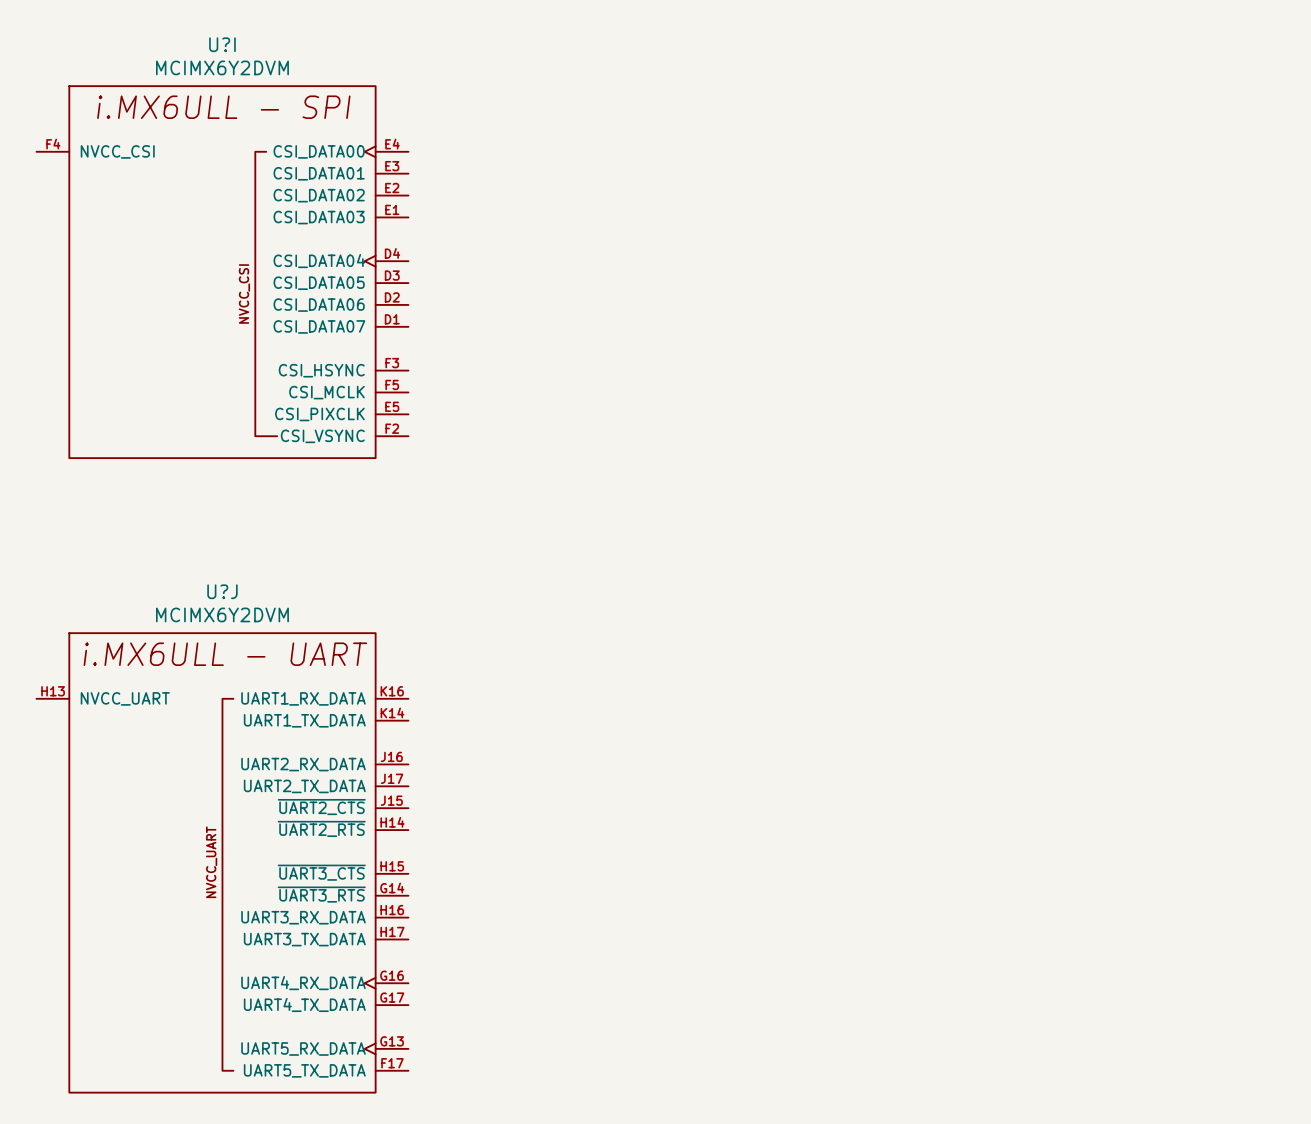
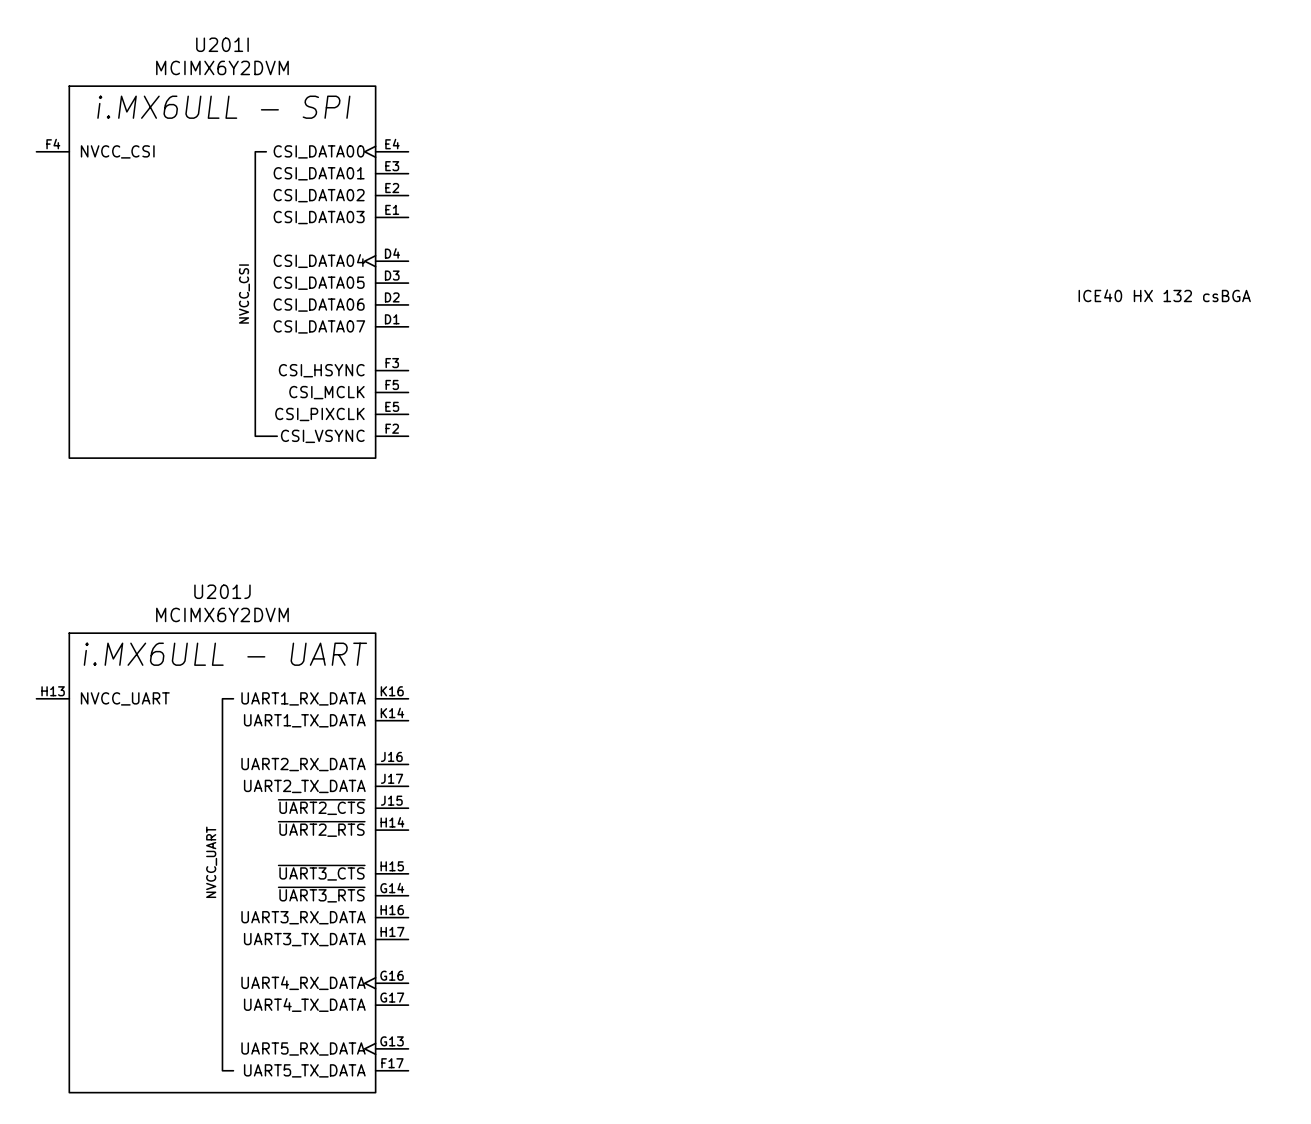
U?I name: U?I (222, 44) -> U201I (222, 44)
text: none -> ICE40 HX 132 csBGA (1164, 295)
U?J name: U?J (222, 591) -> U201J (222, 591)

